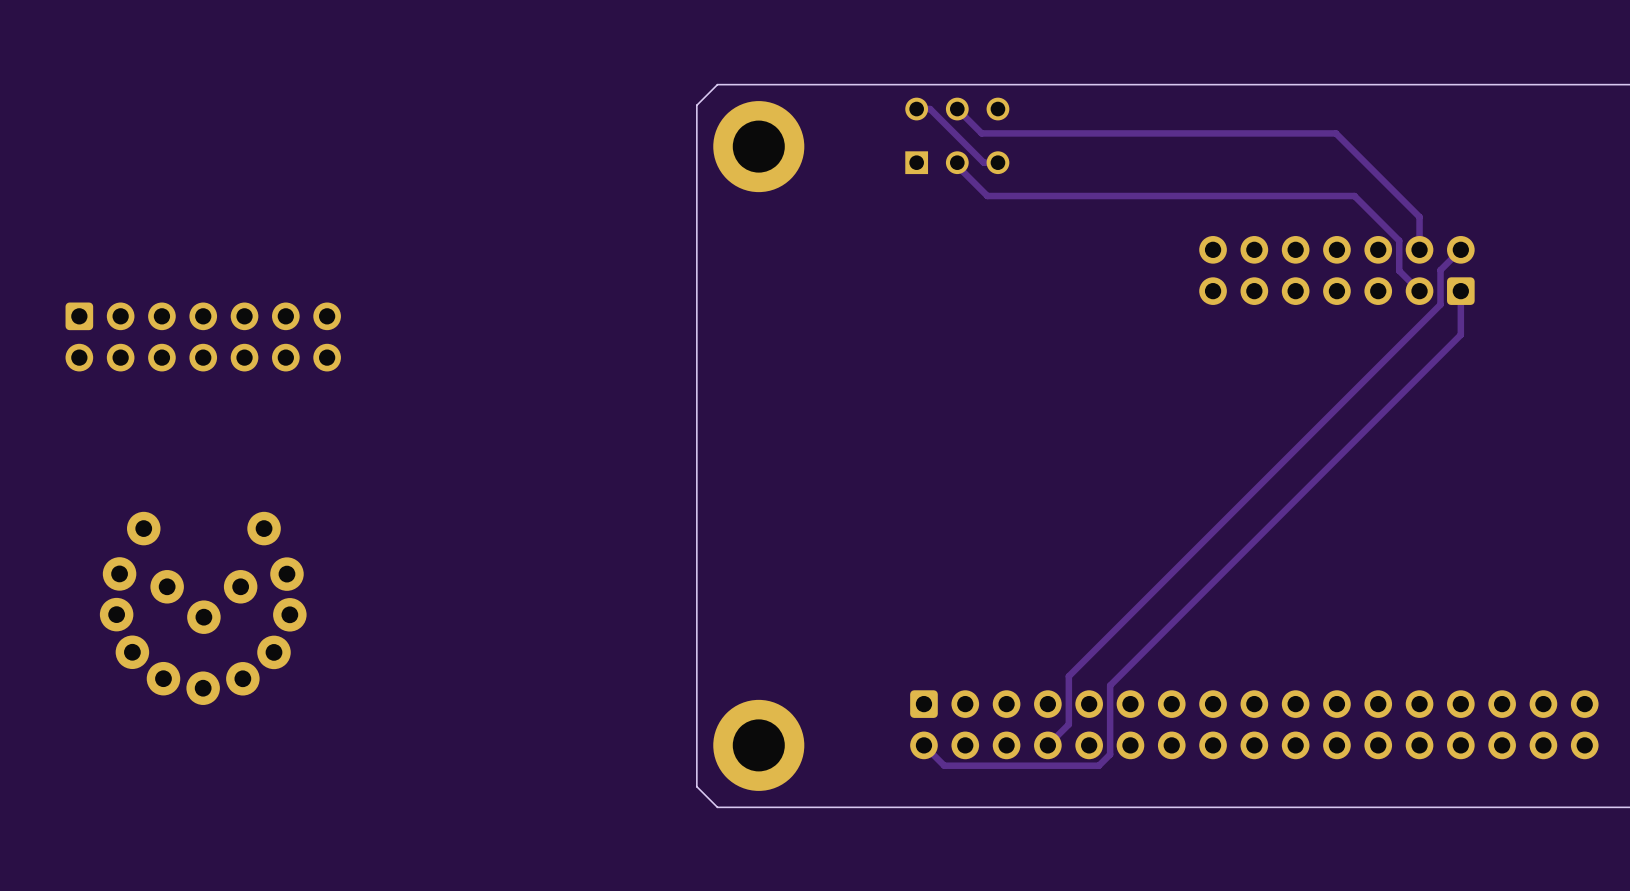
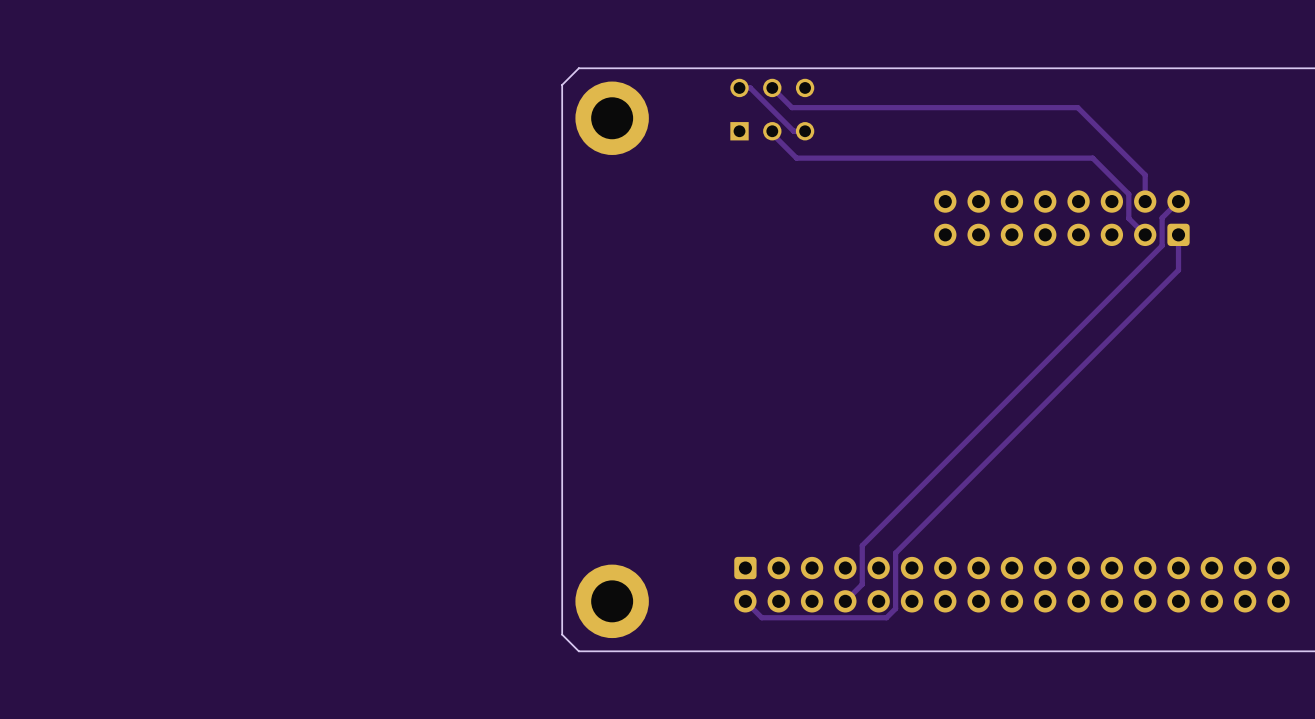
part: none -> (1061, 218)
part: (203, 336) -> none
part: (203, 608) -> none

